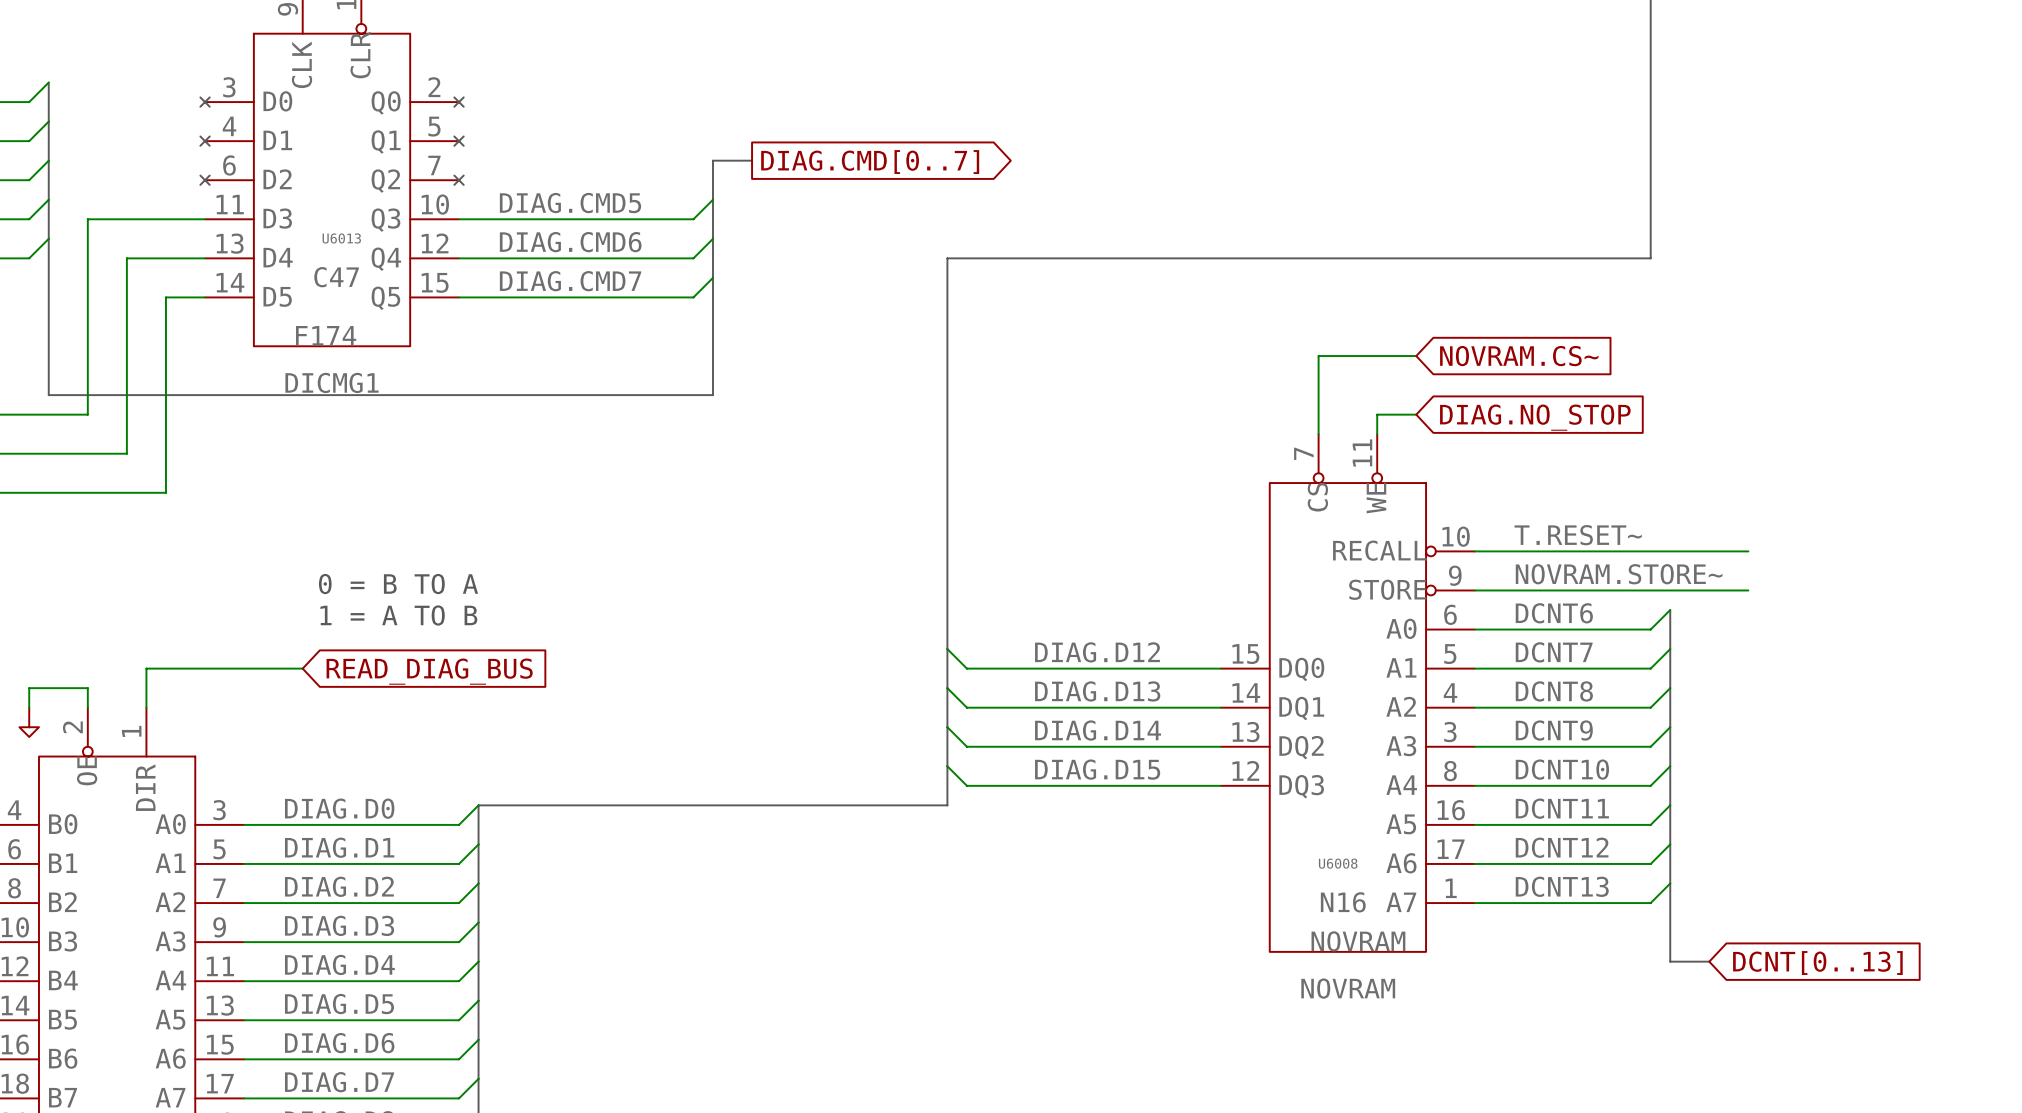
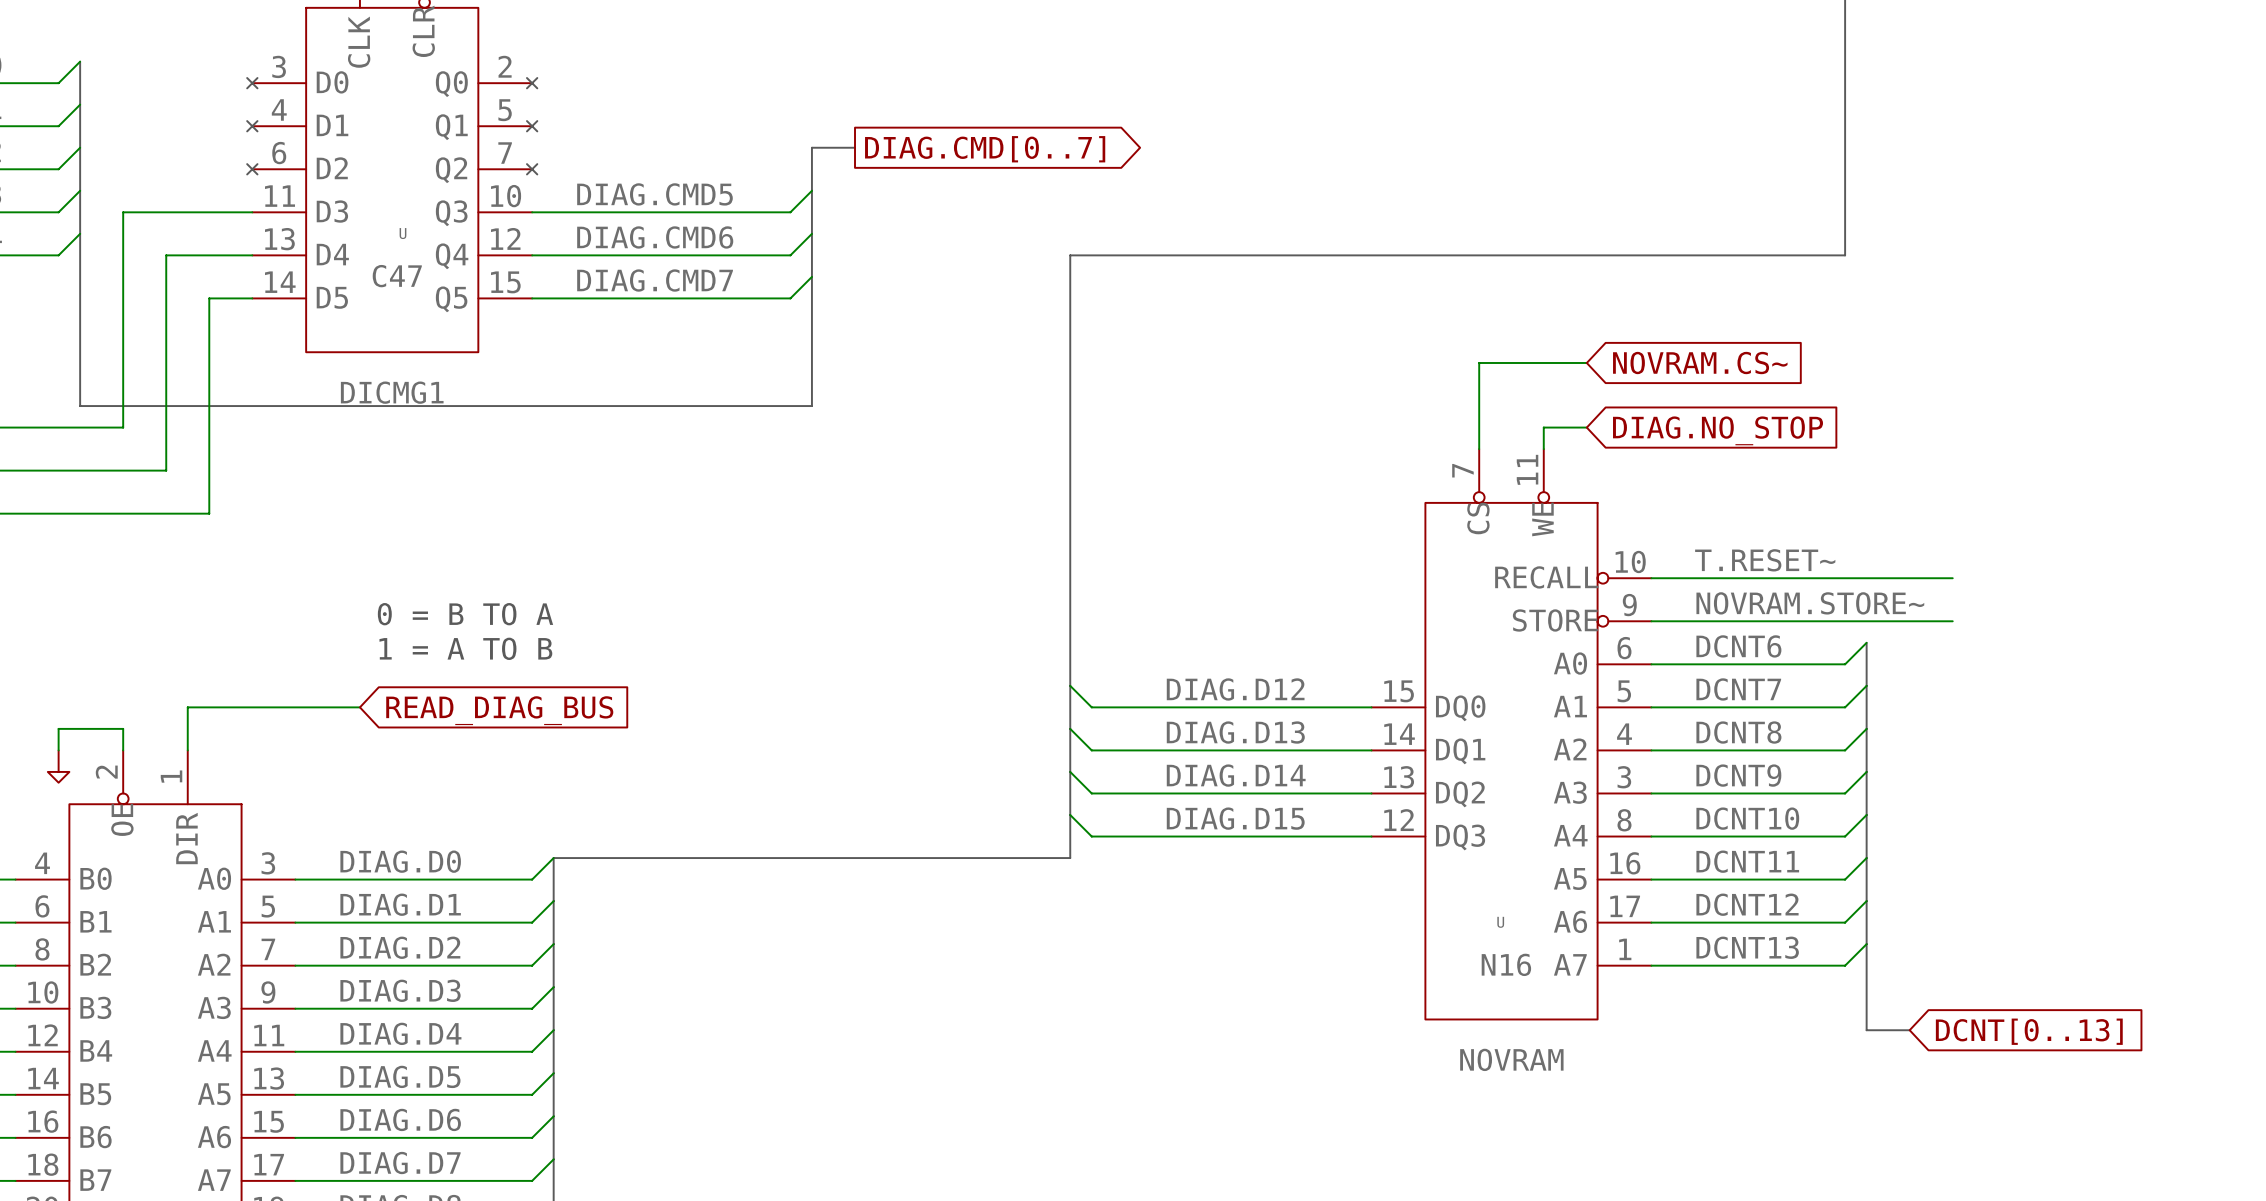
U6013 name: U6013 (341, 238) -> U (402, 233)
U6013 value: F174 (326, 335) -> none
U6008 name: U6008 (1338, 863) -> U (1500, 922)
U6008 value: NOVRAM (1358, 941) -> none

